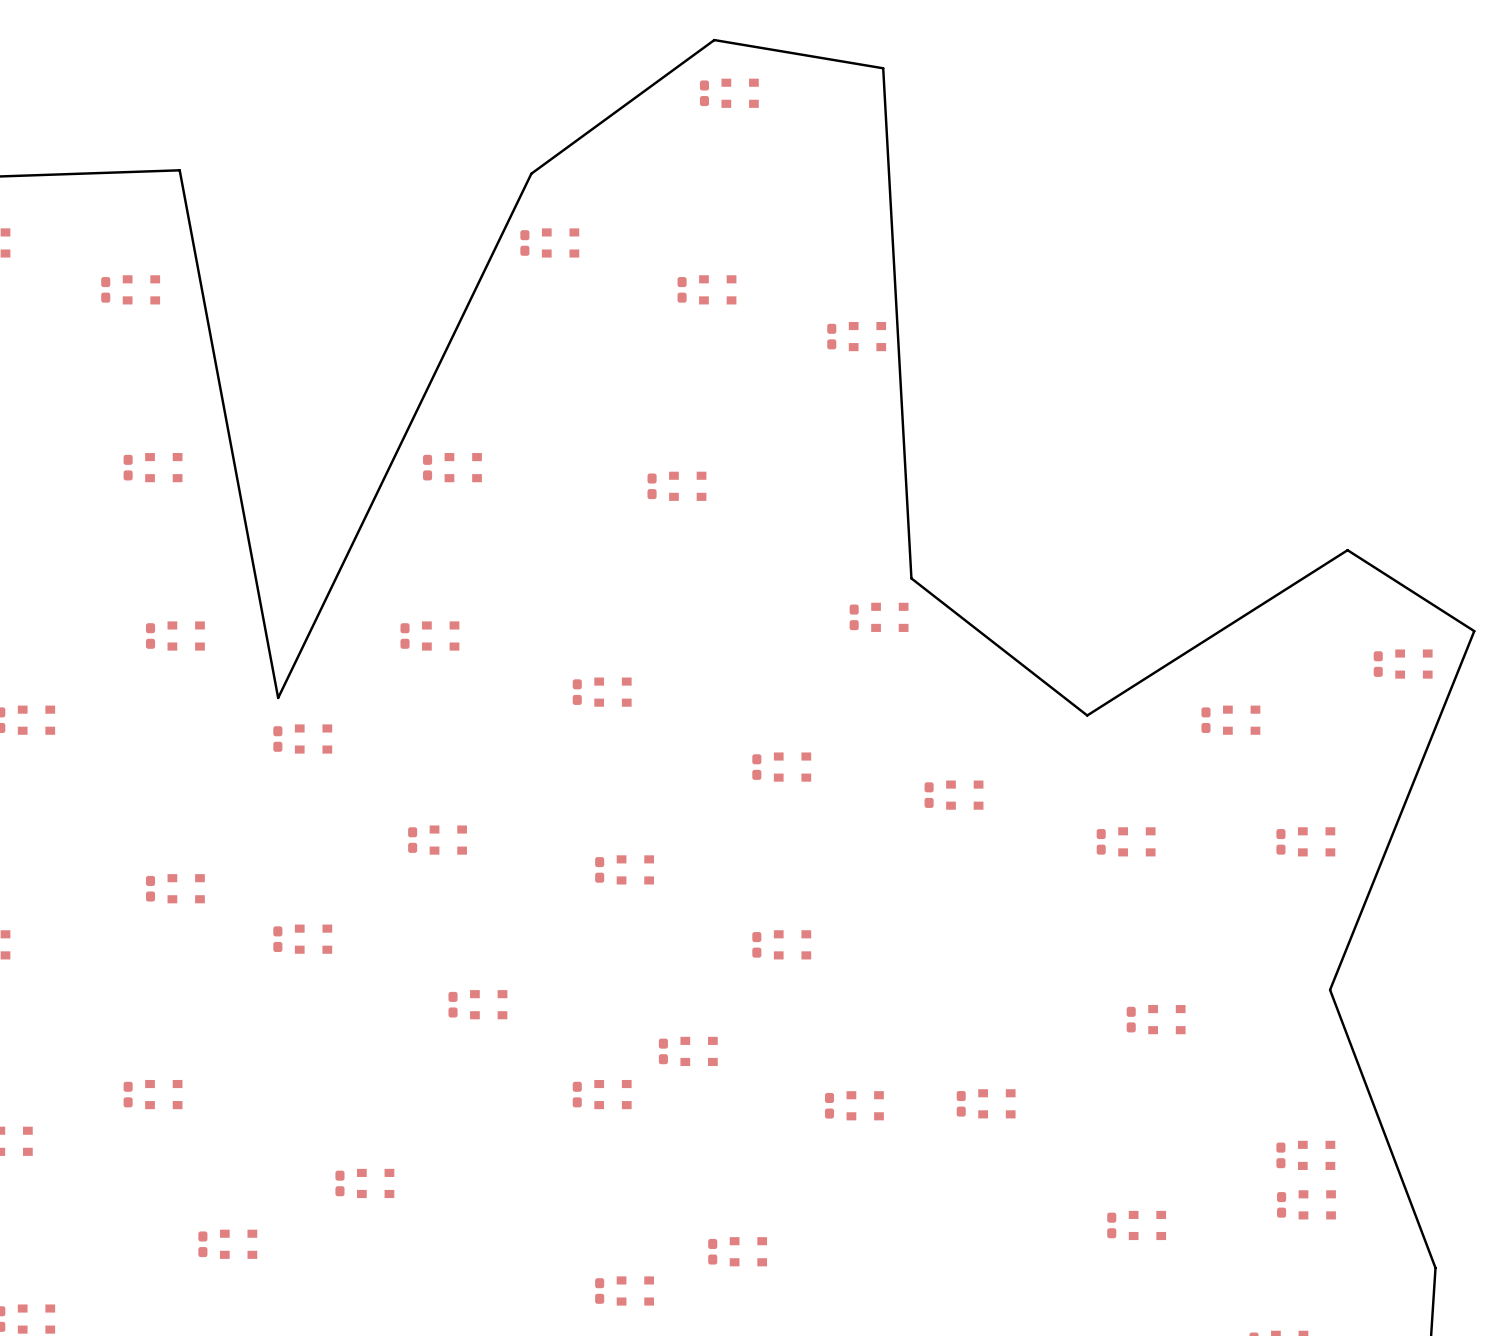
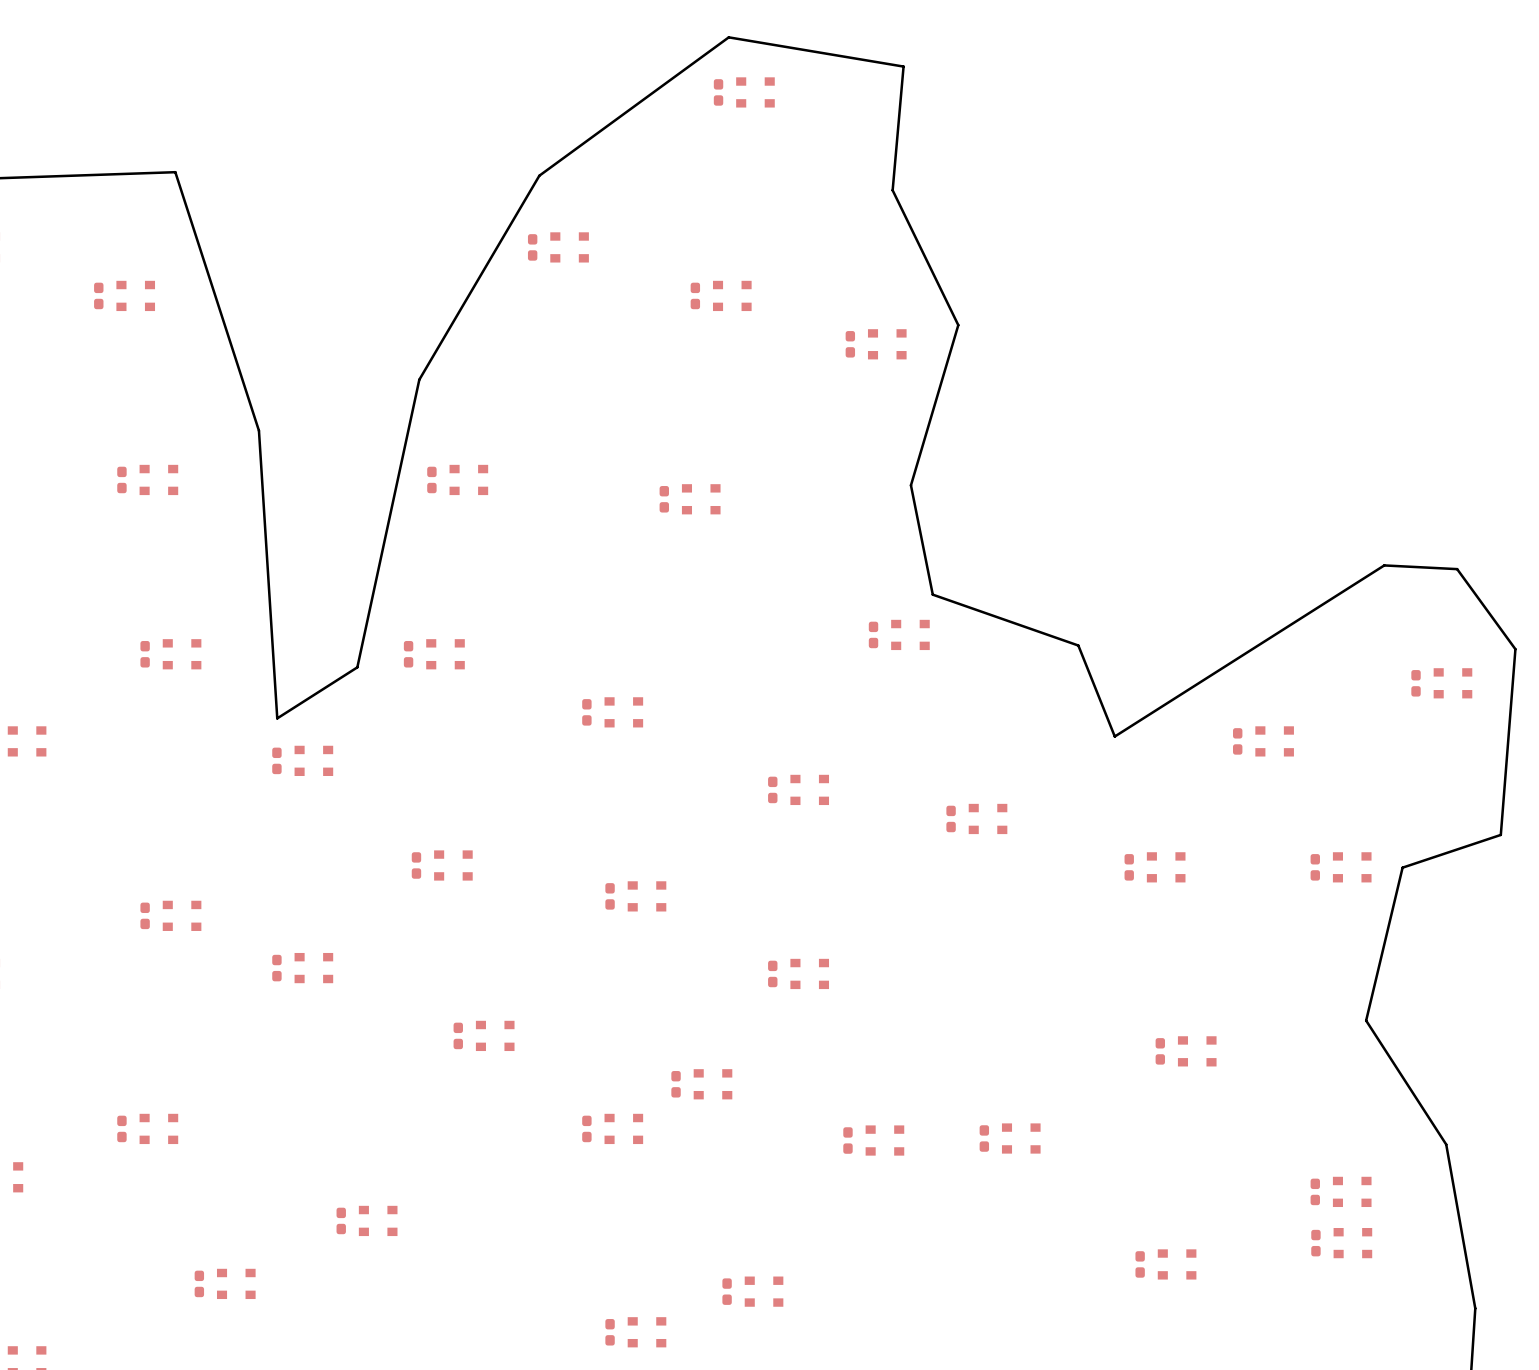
board edge: (883, 68) (911, 578) (1087, 715) -> (903, 66) (892, 190) (958, 325) (910, 485) (932, 594) (1078, 645) (1114, 736)
board edge: (179, 170) (278, 697) (531, 173) -> (175, 172) (258, 430) (277, 718) (357, 667) (419, 379) (539, 175)
board edge: (1347, 550) (1474, 631) (1330, 989) (1435, 1267) -> (1384, 565) (1457, 569) (1515, 649) (1500, 834) (1402, 867) (1366, 1020) (1446, 1144) (1475, 1308)

